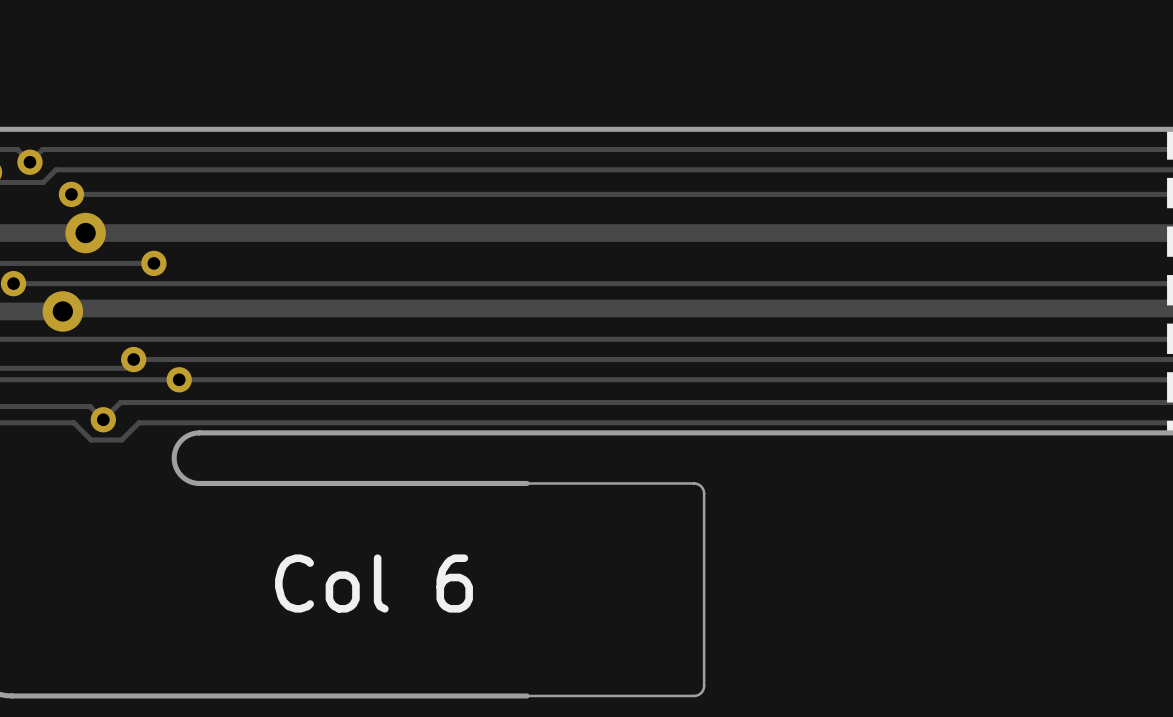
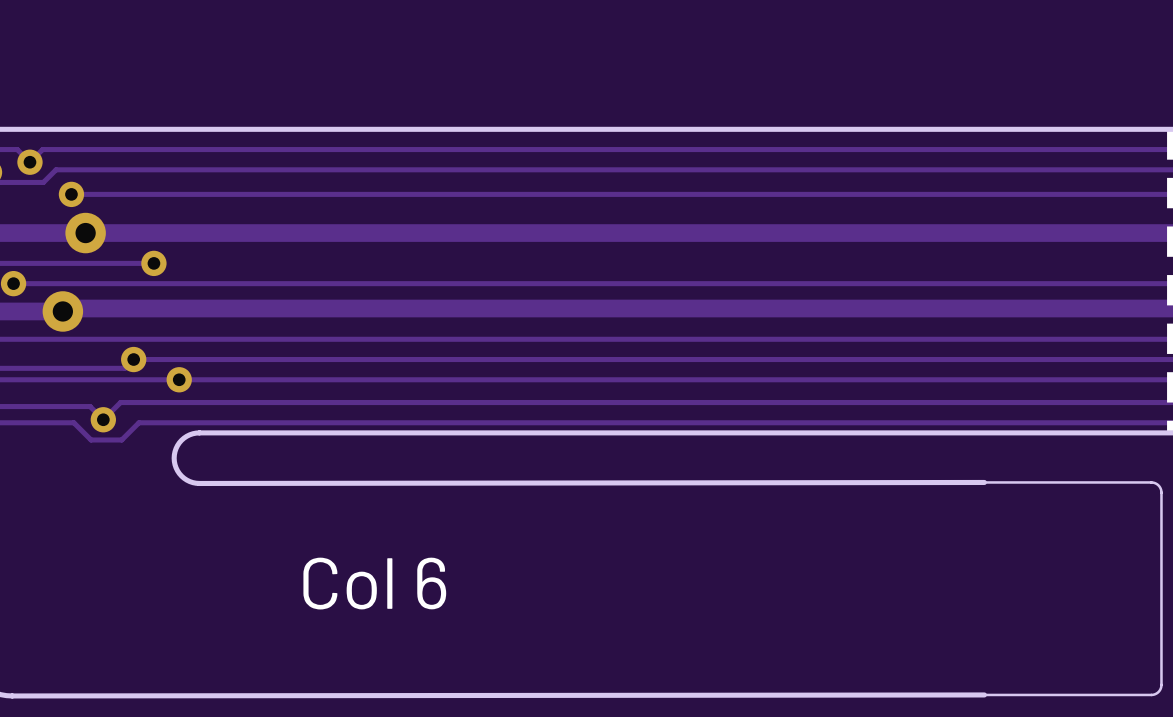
board edge: (199, 483) (527, 483) -> (199, 483) (984, 482)
part position: (615, 589) -> (1072, 588)
board edge: (12, 695) (527, 695) -> (12, 695) (984, 694)

